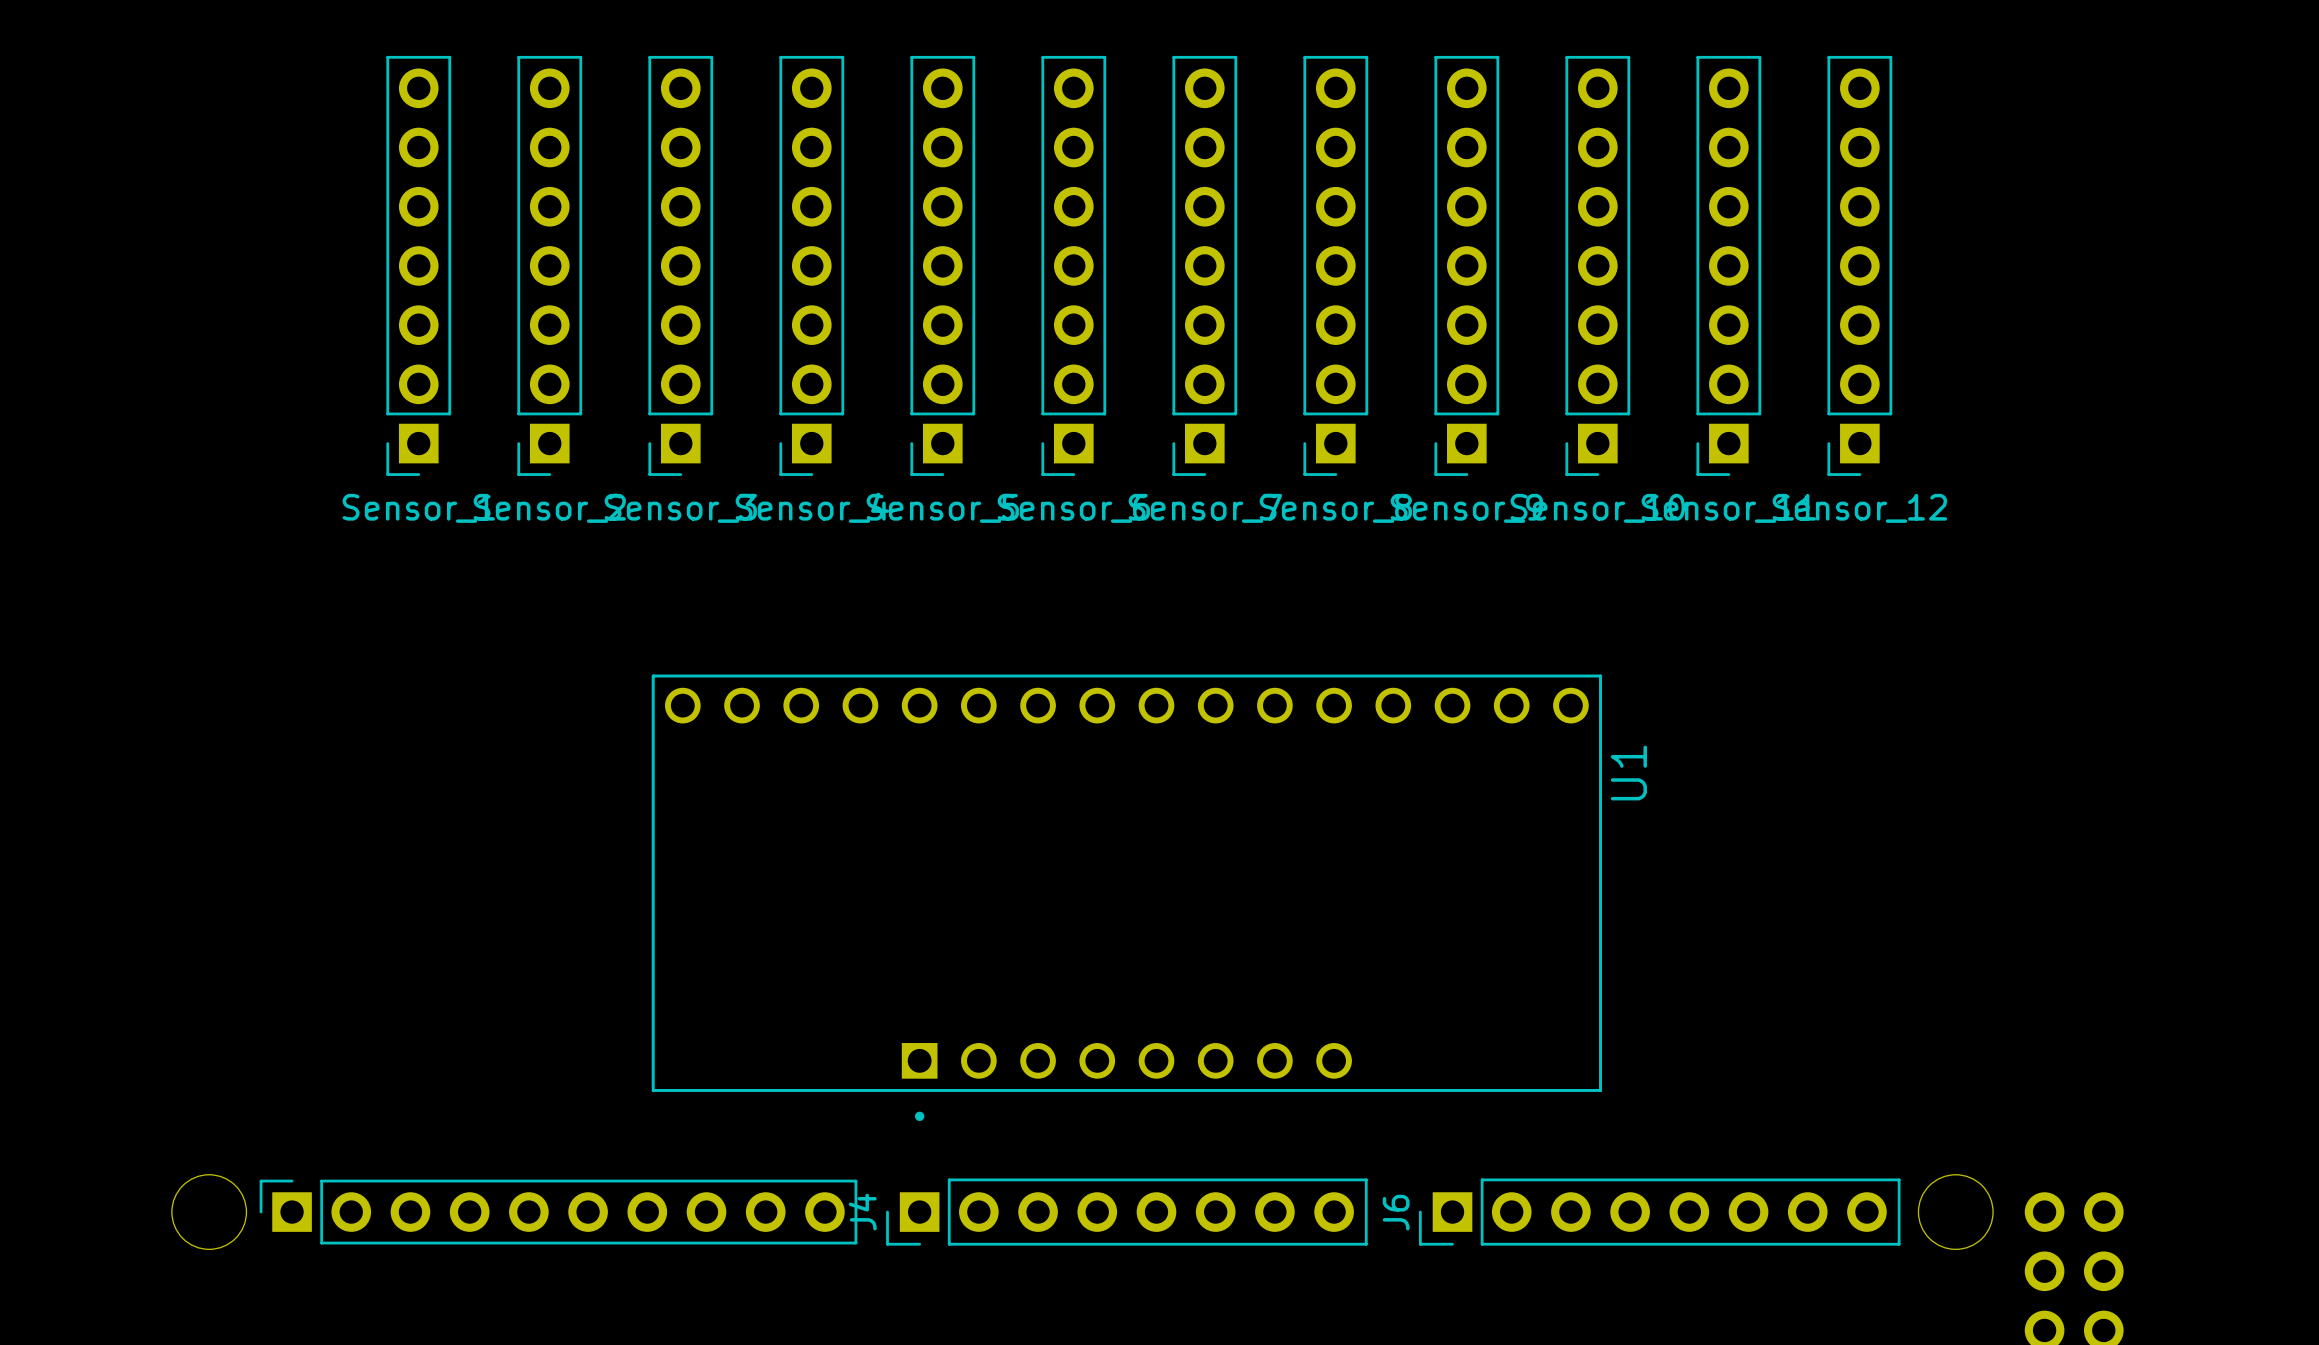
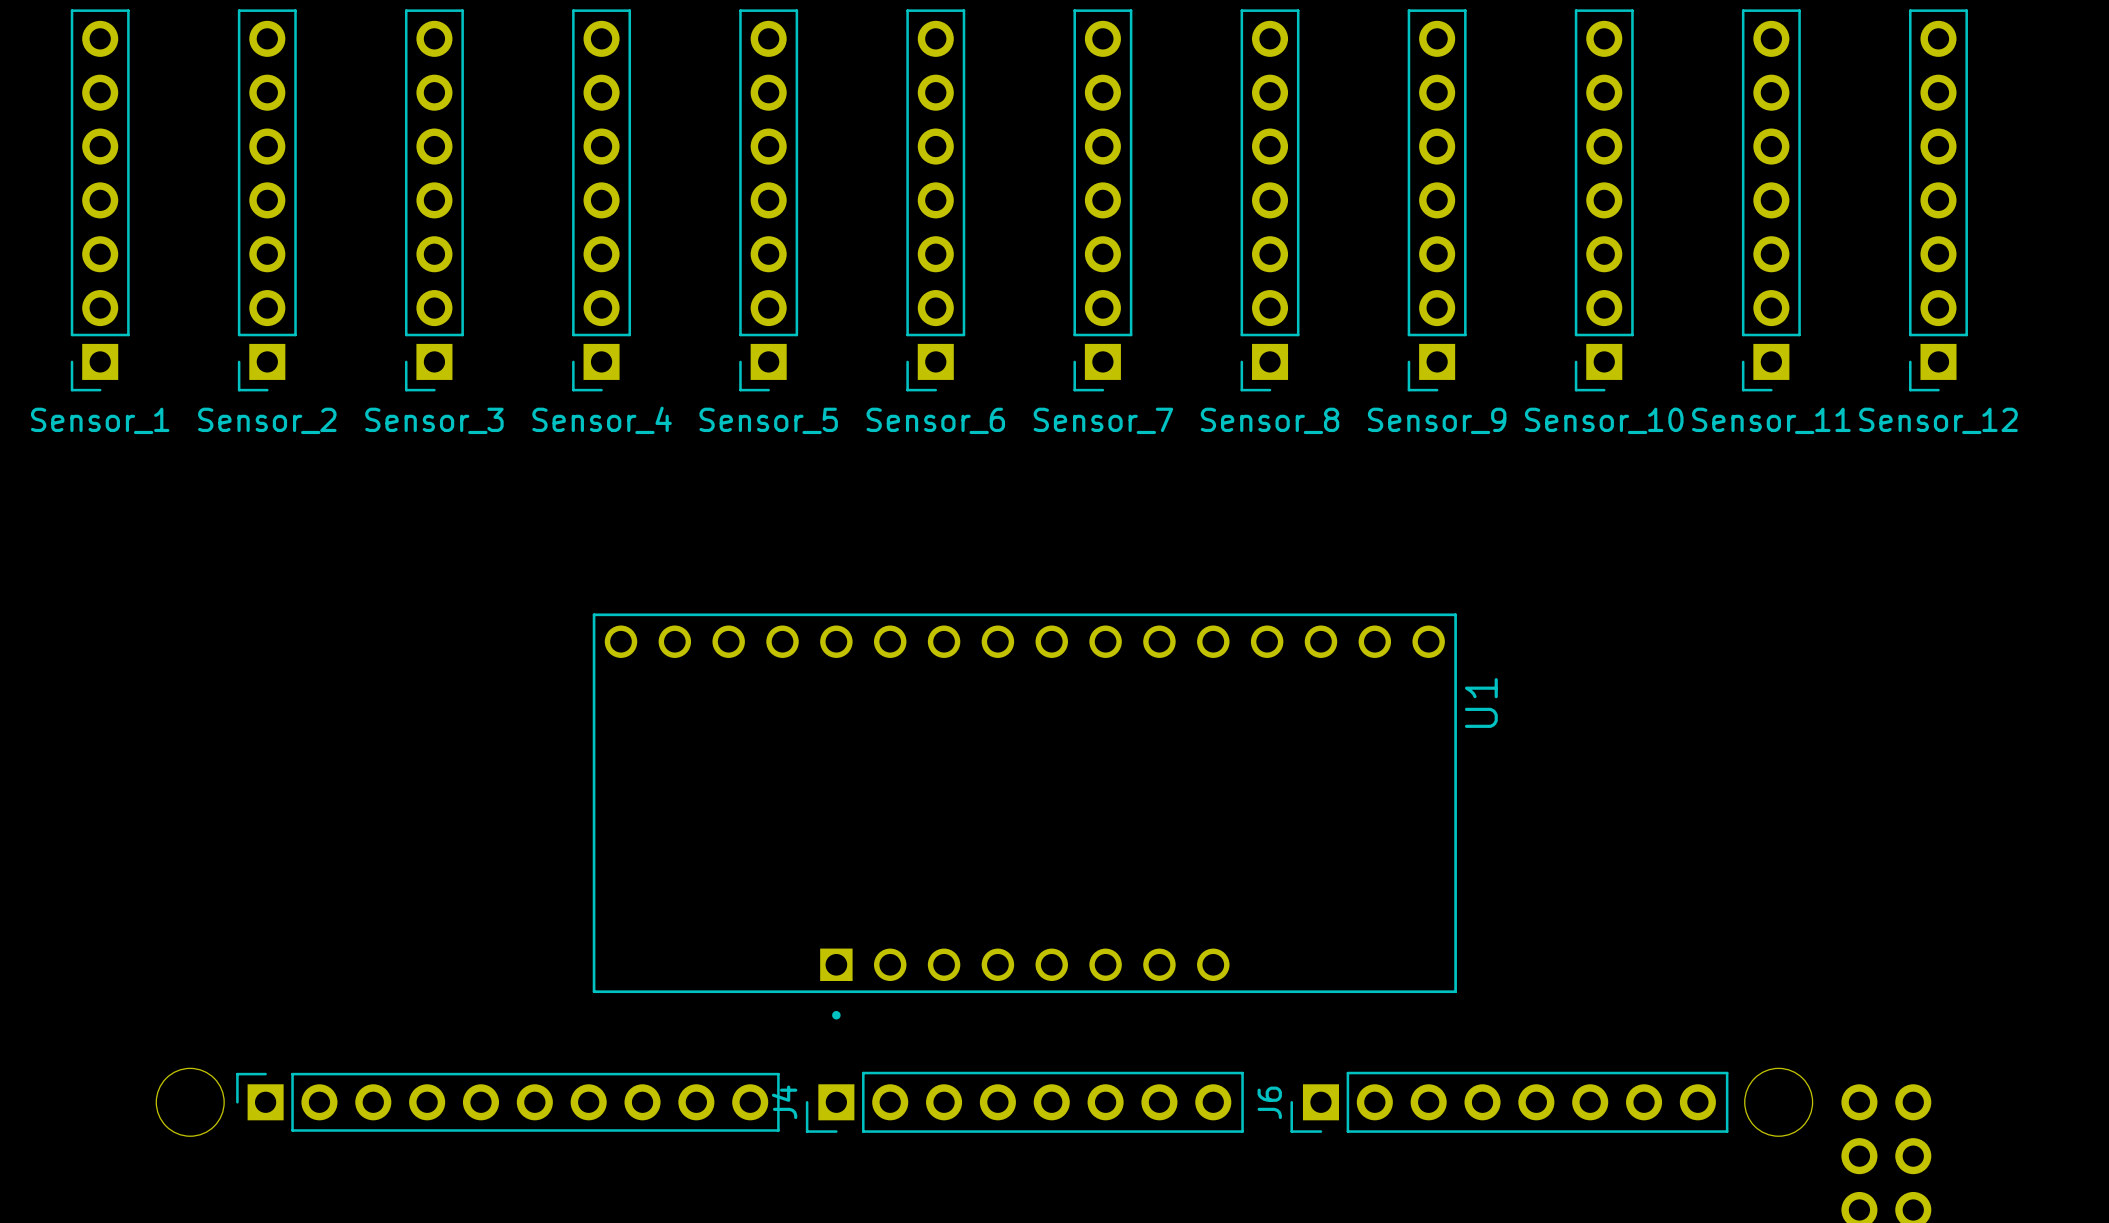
Sensor_1 position: (418, 265) -> (100, 200)
Sensor_2 position: (549, 265) -> (267, 200)
Sensor_3 position: (680, 265) -> (434, 200)
Sensor_4 position: (811, 265) -> (601, 200)
Sensor_5 position: (942, 265) -> (768, 200)
Sensor_6 position: (1073, 265) -> (935, 200)
Sensor_7 position: (1204, 265) -> (1102, 200)
Sensor_8 position: (1335, 265) -> (1270, 200)
Sensor_9 position: (1466, 265) -> (1437, 200)
Sensor_10 position: (1597, 265) -> (1604, 200)
Sensor_11 position: (1728, 265) -> (1771, 200)
Sensor_12 position: (1859, 265) -> (1938, 200)

